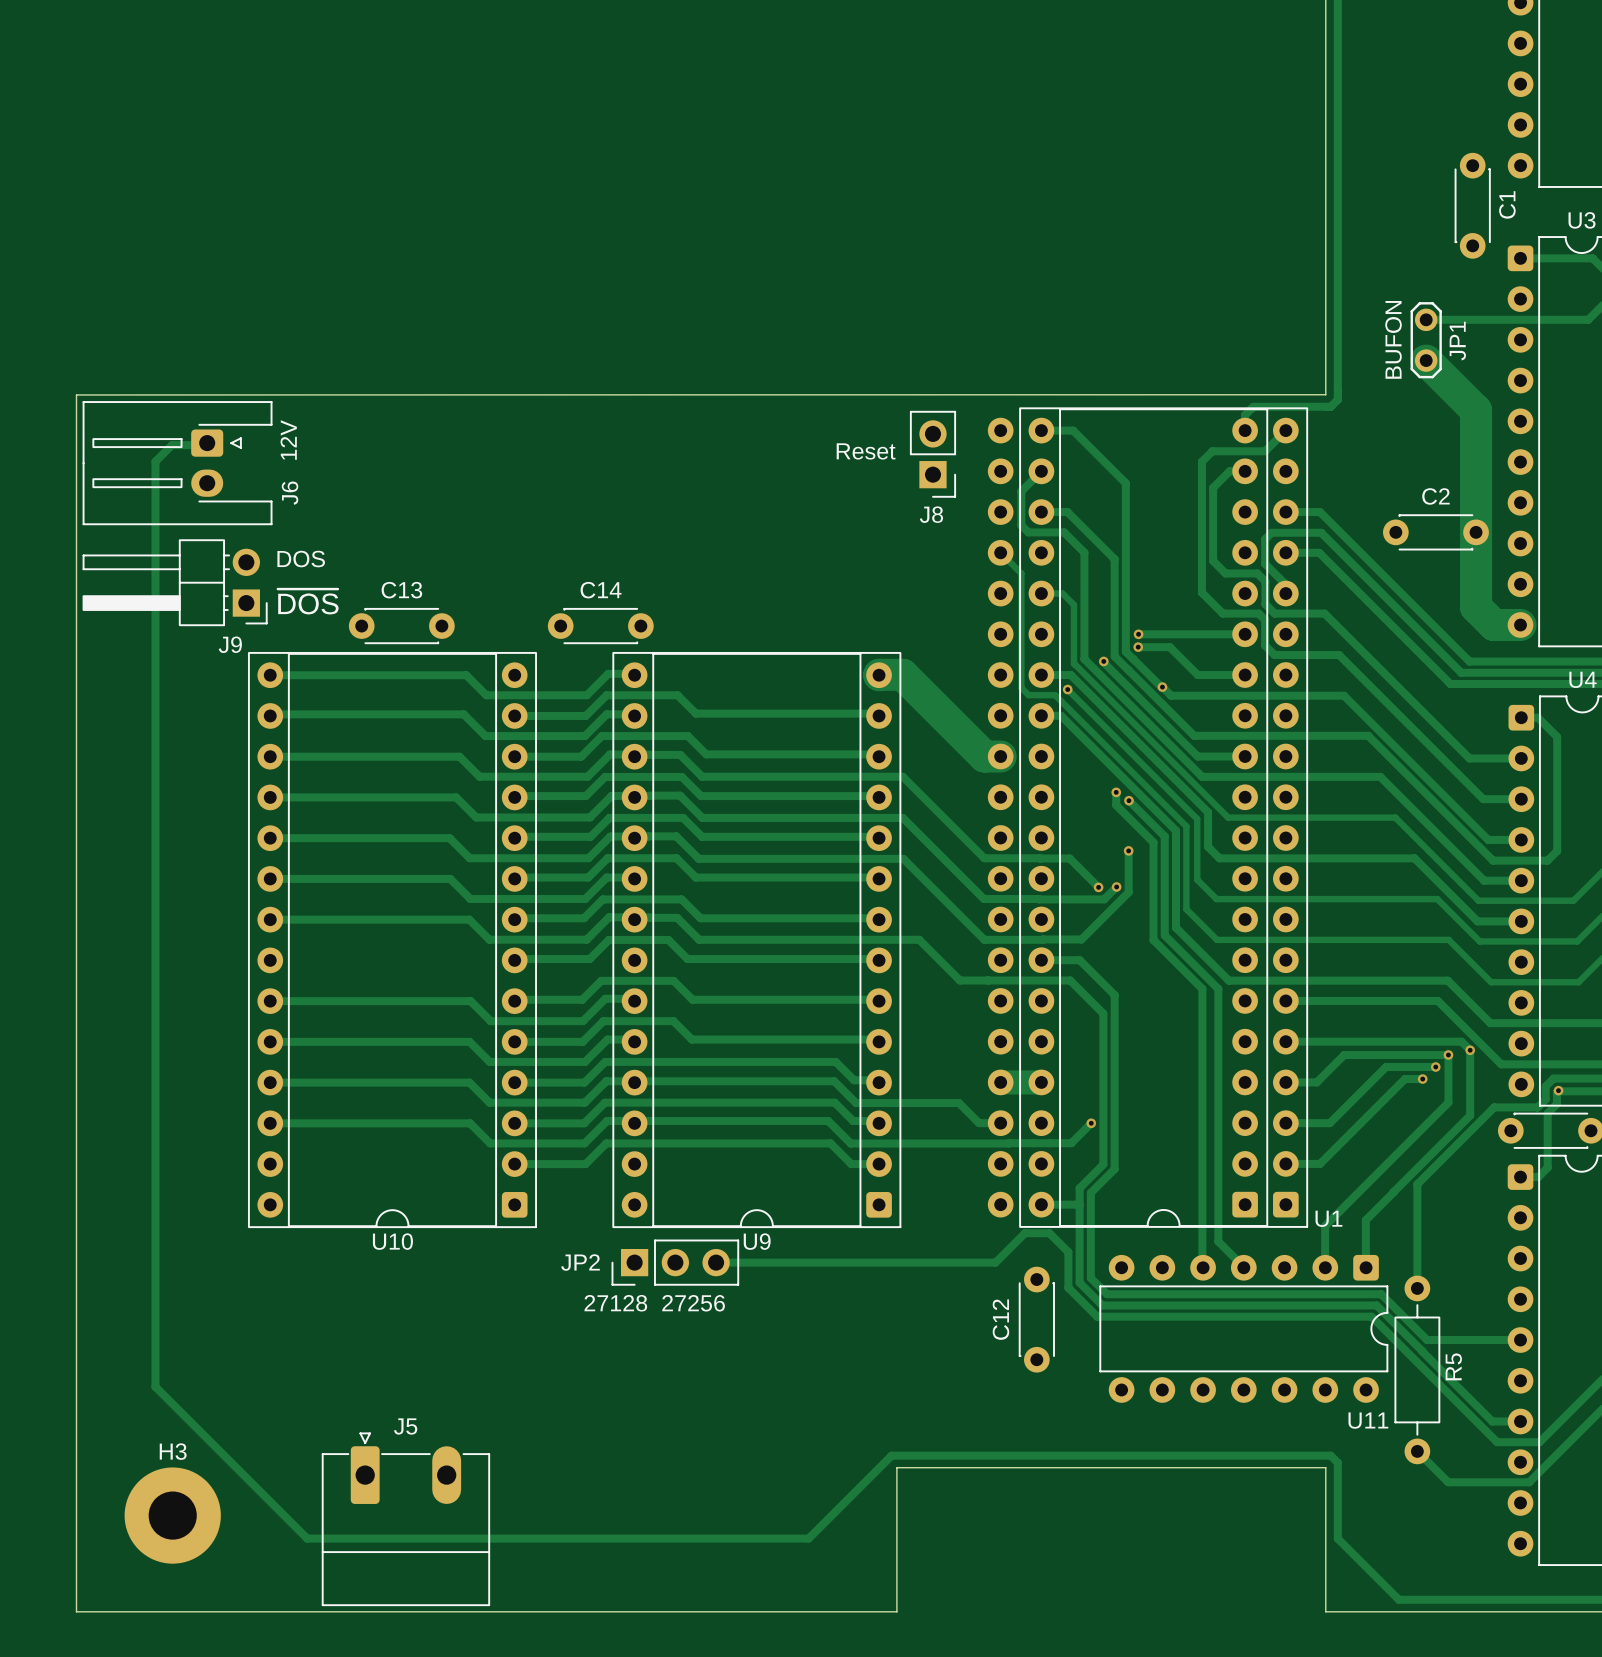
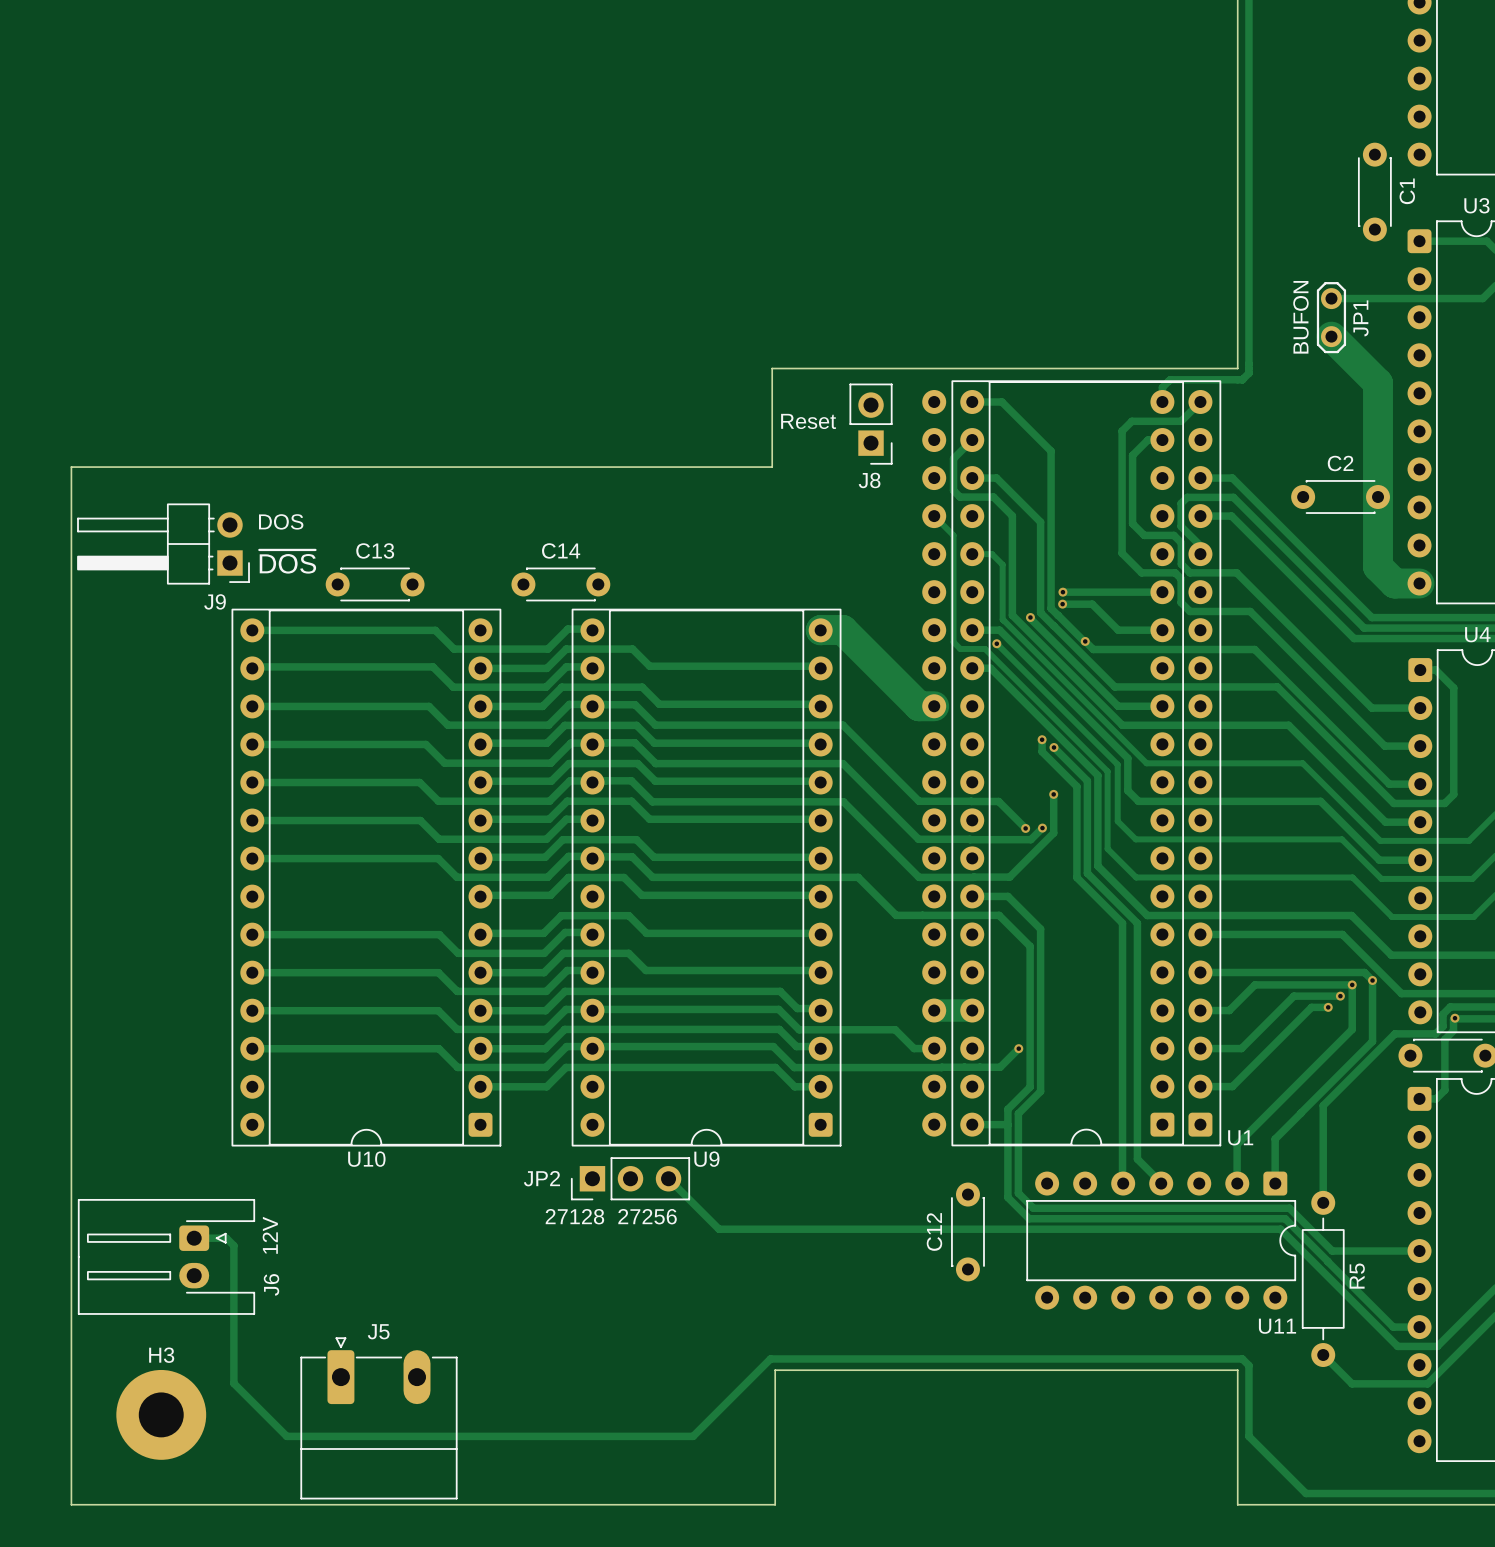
board edge: (1325, 394) (76, 394) (76, 500) -> (1237, 368) (772, 368) (772, 467) (71, 467)
track: (205, 445) (171, 445) (155, 461) (155, 1386) (250, 1481) -> (194, 1238) (226, 1238) (233, 1245) (233, 1383)
J6 position: (177, 463) -> (166, 1256)
track: (716, 1262) (995, 1262) (1024, 1233) (1049, 1233) (1068, 1252) (1068, 1287) (1097, 1316) -> (668, 1178) (719, 1229) (1024, 1229)
track: (891, 1455) (808, 1538) (742, 1538) -> (832, 1358) (770, 1358) (693, 1436)
board edge: (896, 1467) (896, 1611) (830, 1611) -> (837, 1370) (775, 1370) (775, 1504)

